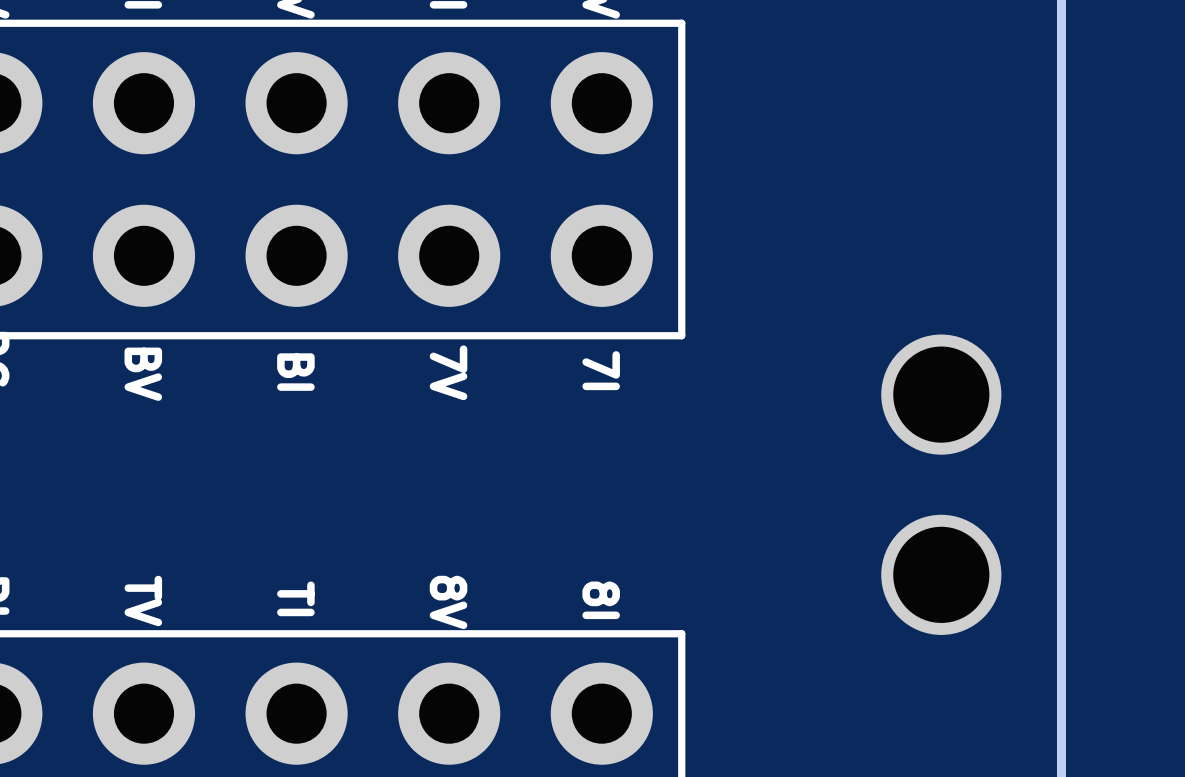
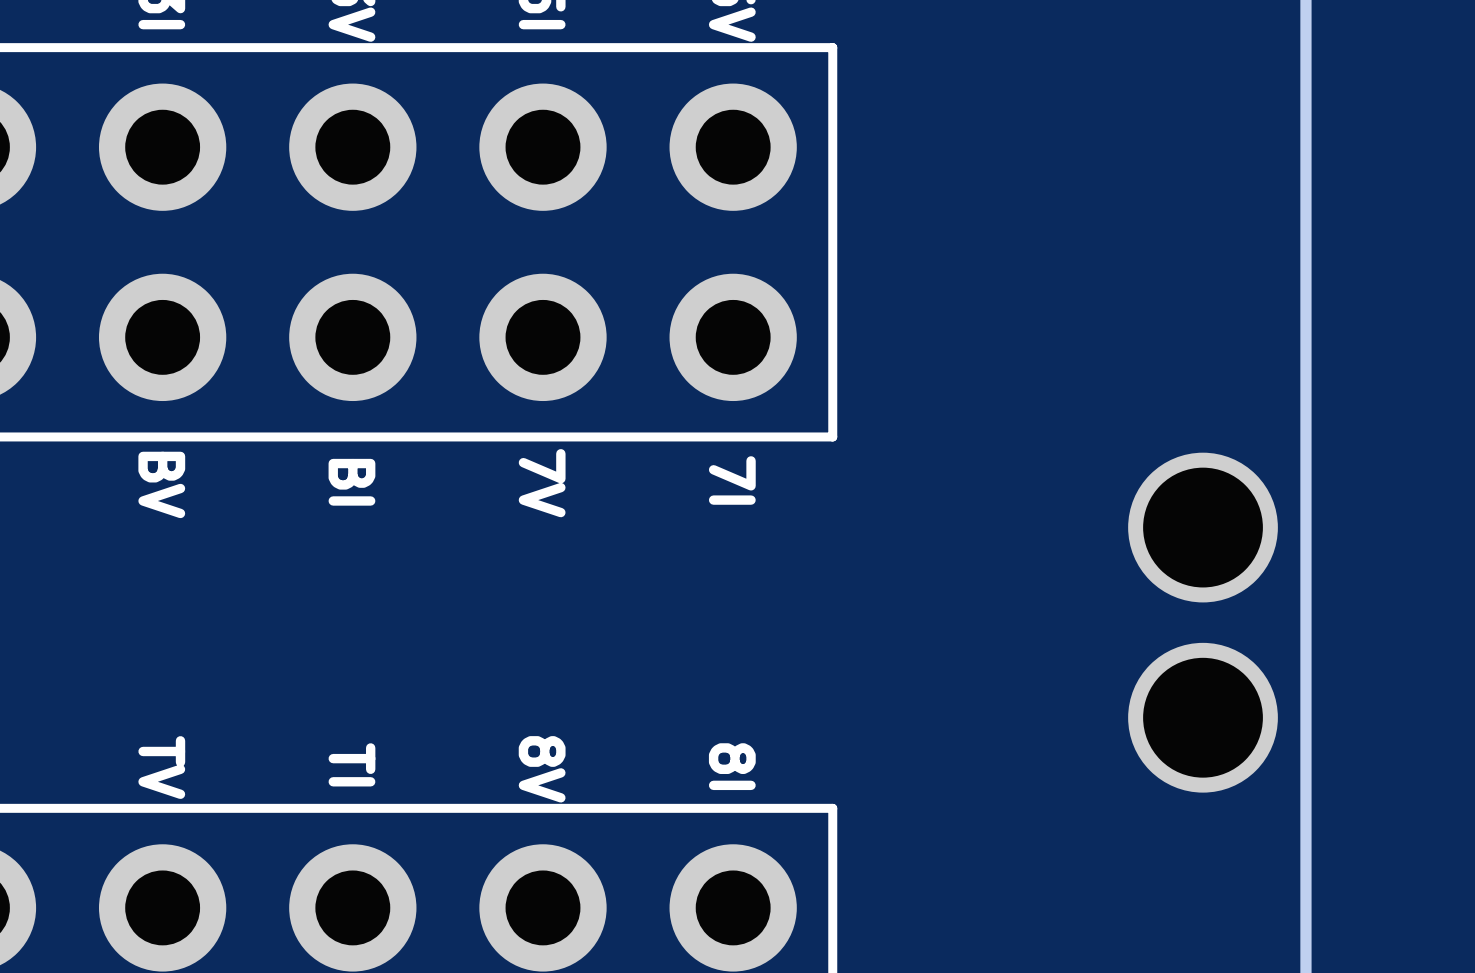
part position: (941, 394) -> (1203, 527)
part position: (941, 574) -> (1203, 717)

